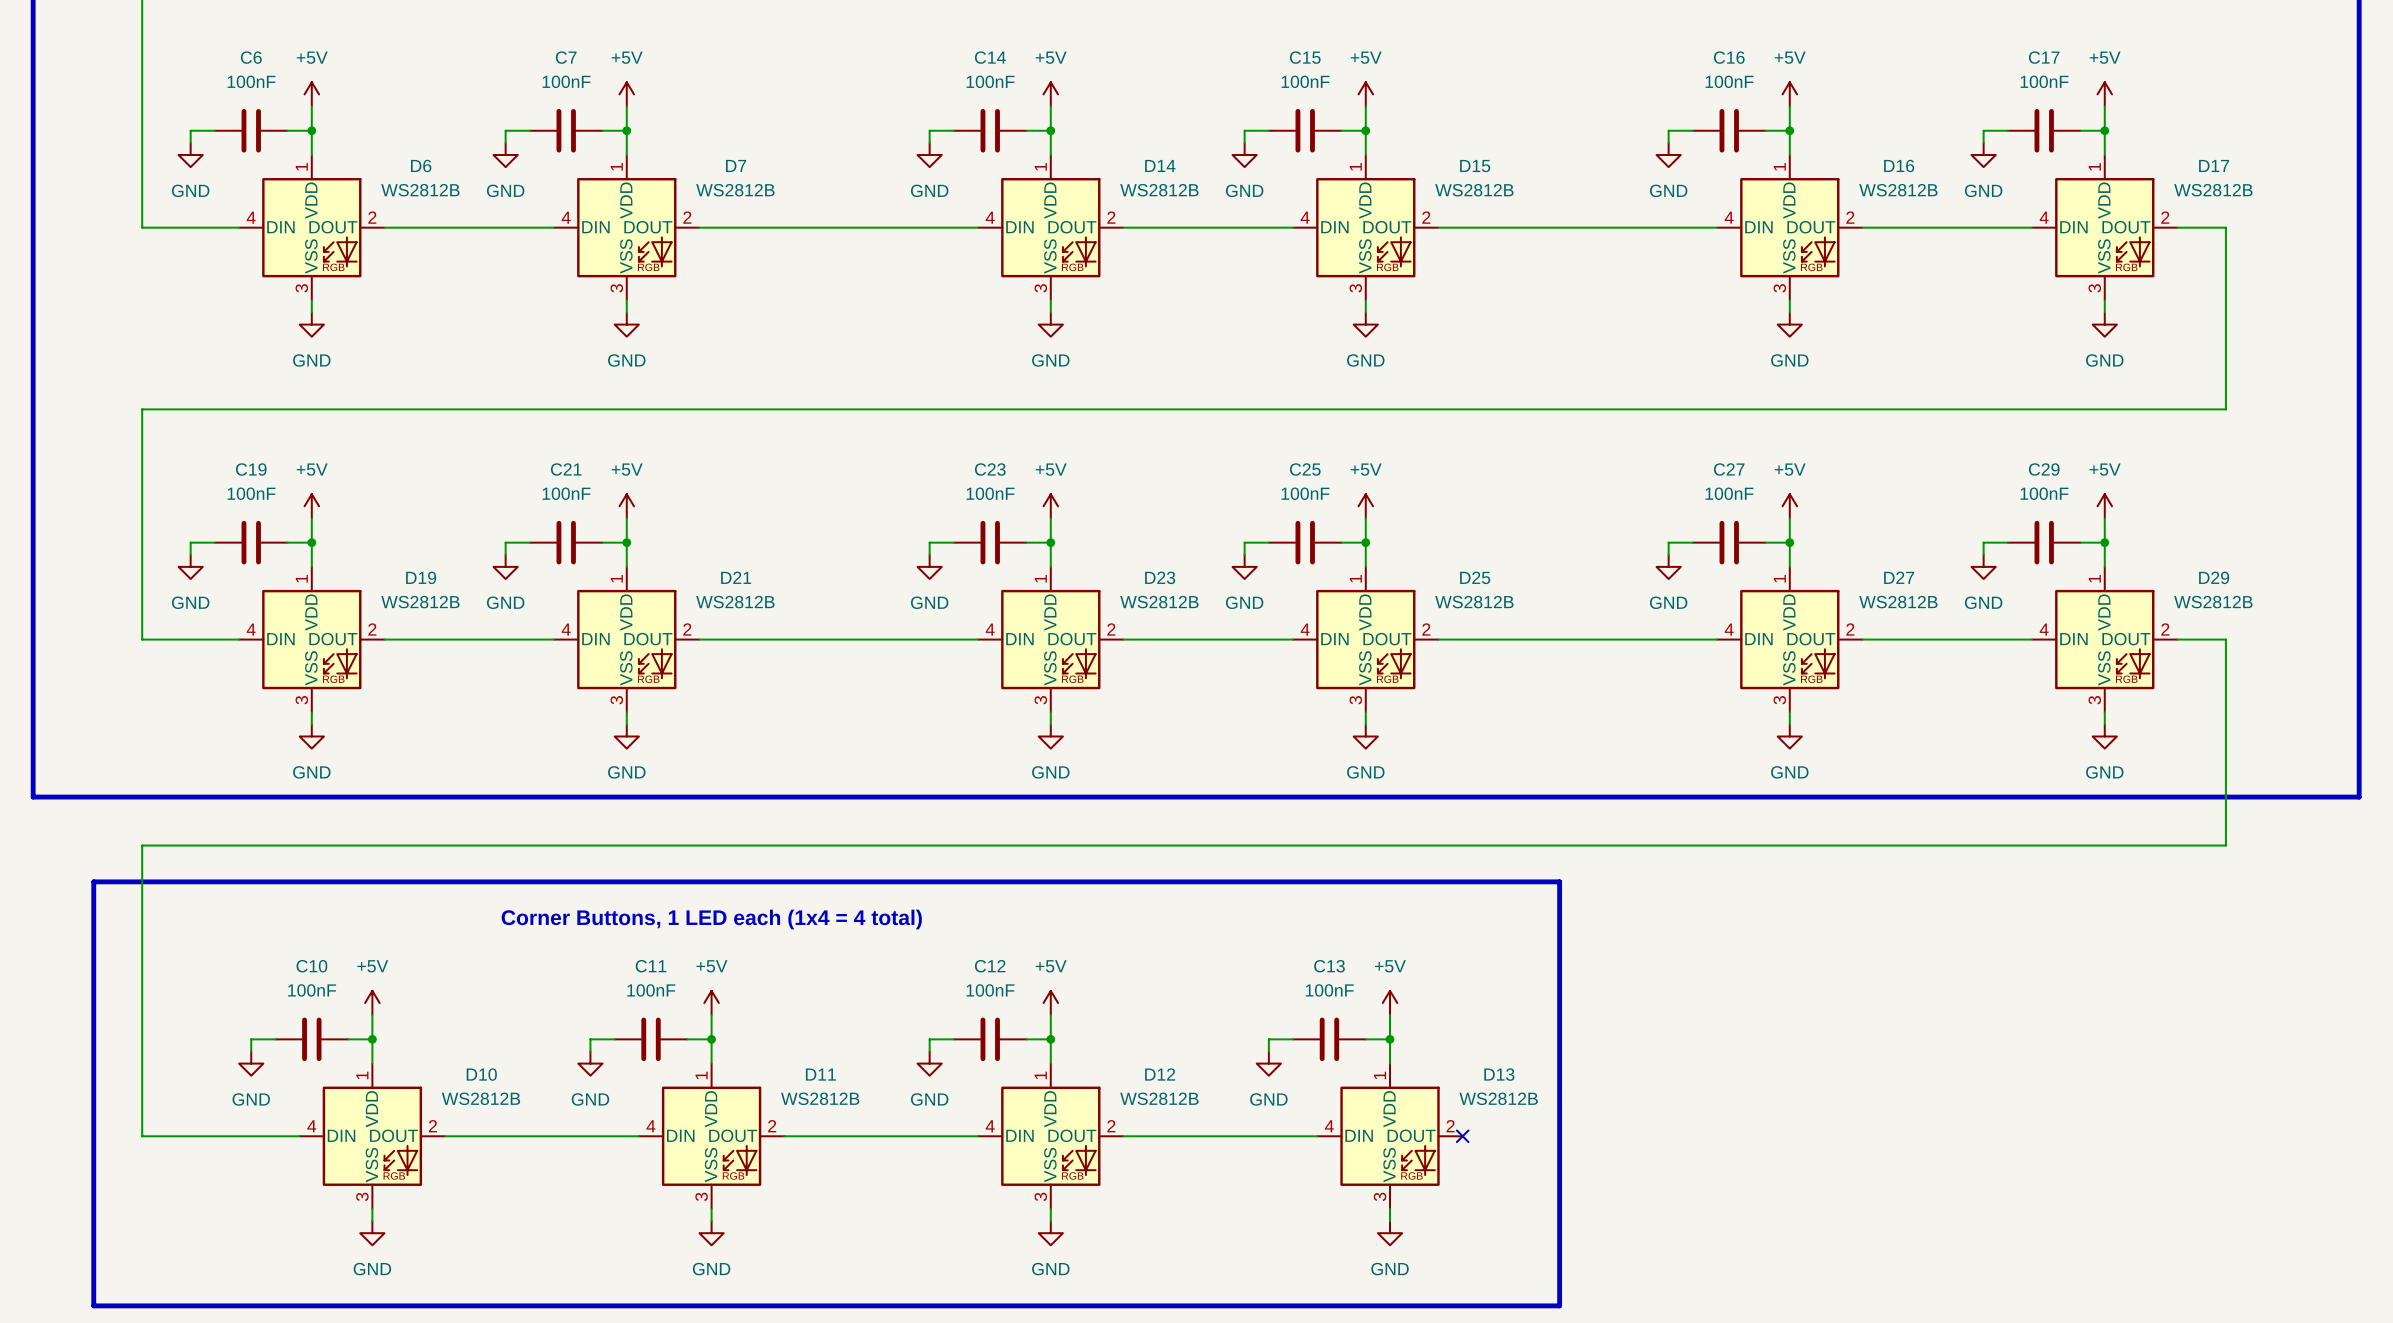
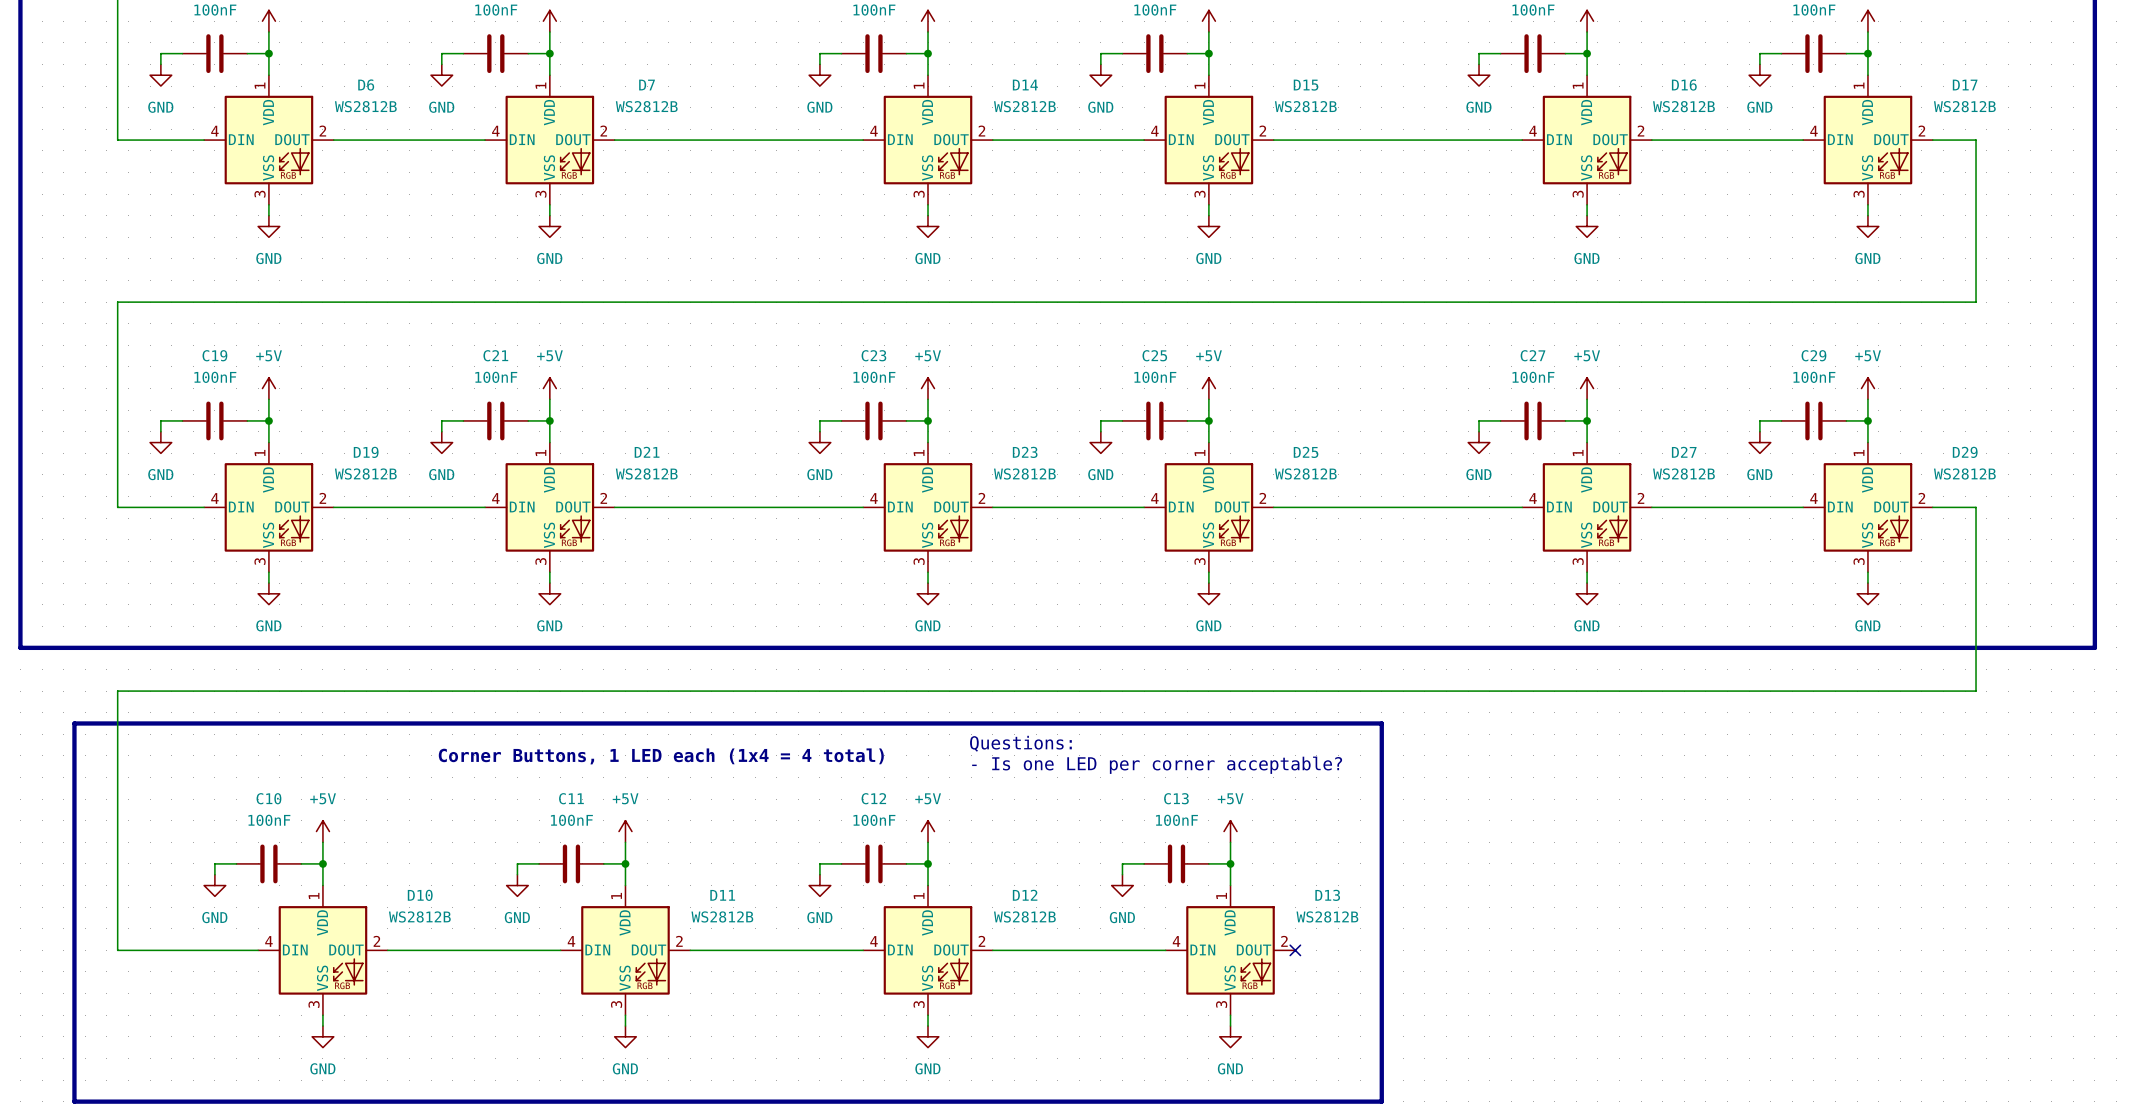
text: none -> Questions: (1020, 743)
text: none -> - Is one LED per corner acceptable? (1157, 765)

